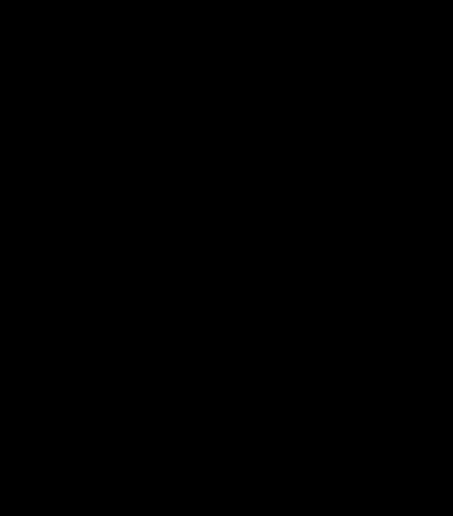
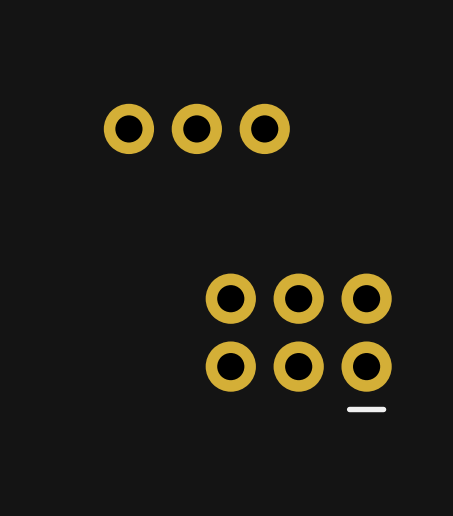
part: none -> (196, 128)
part: none -> (298, 342)

